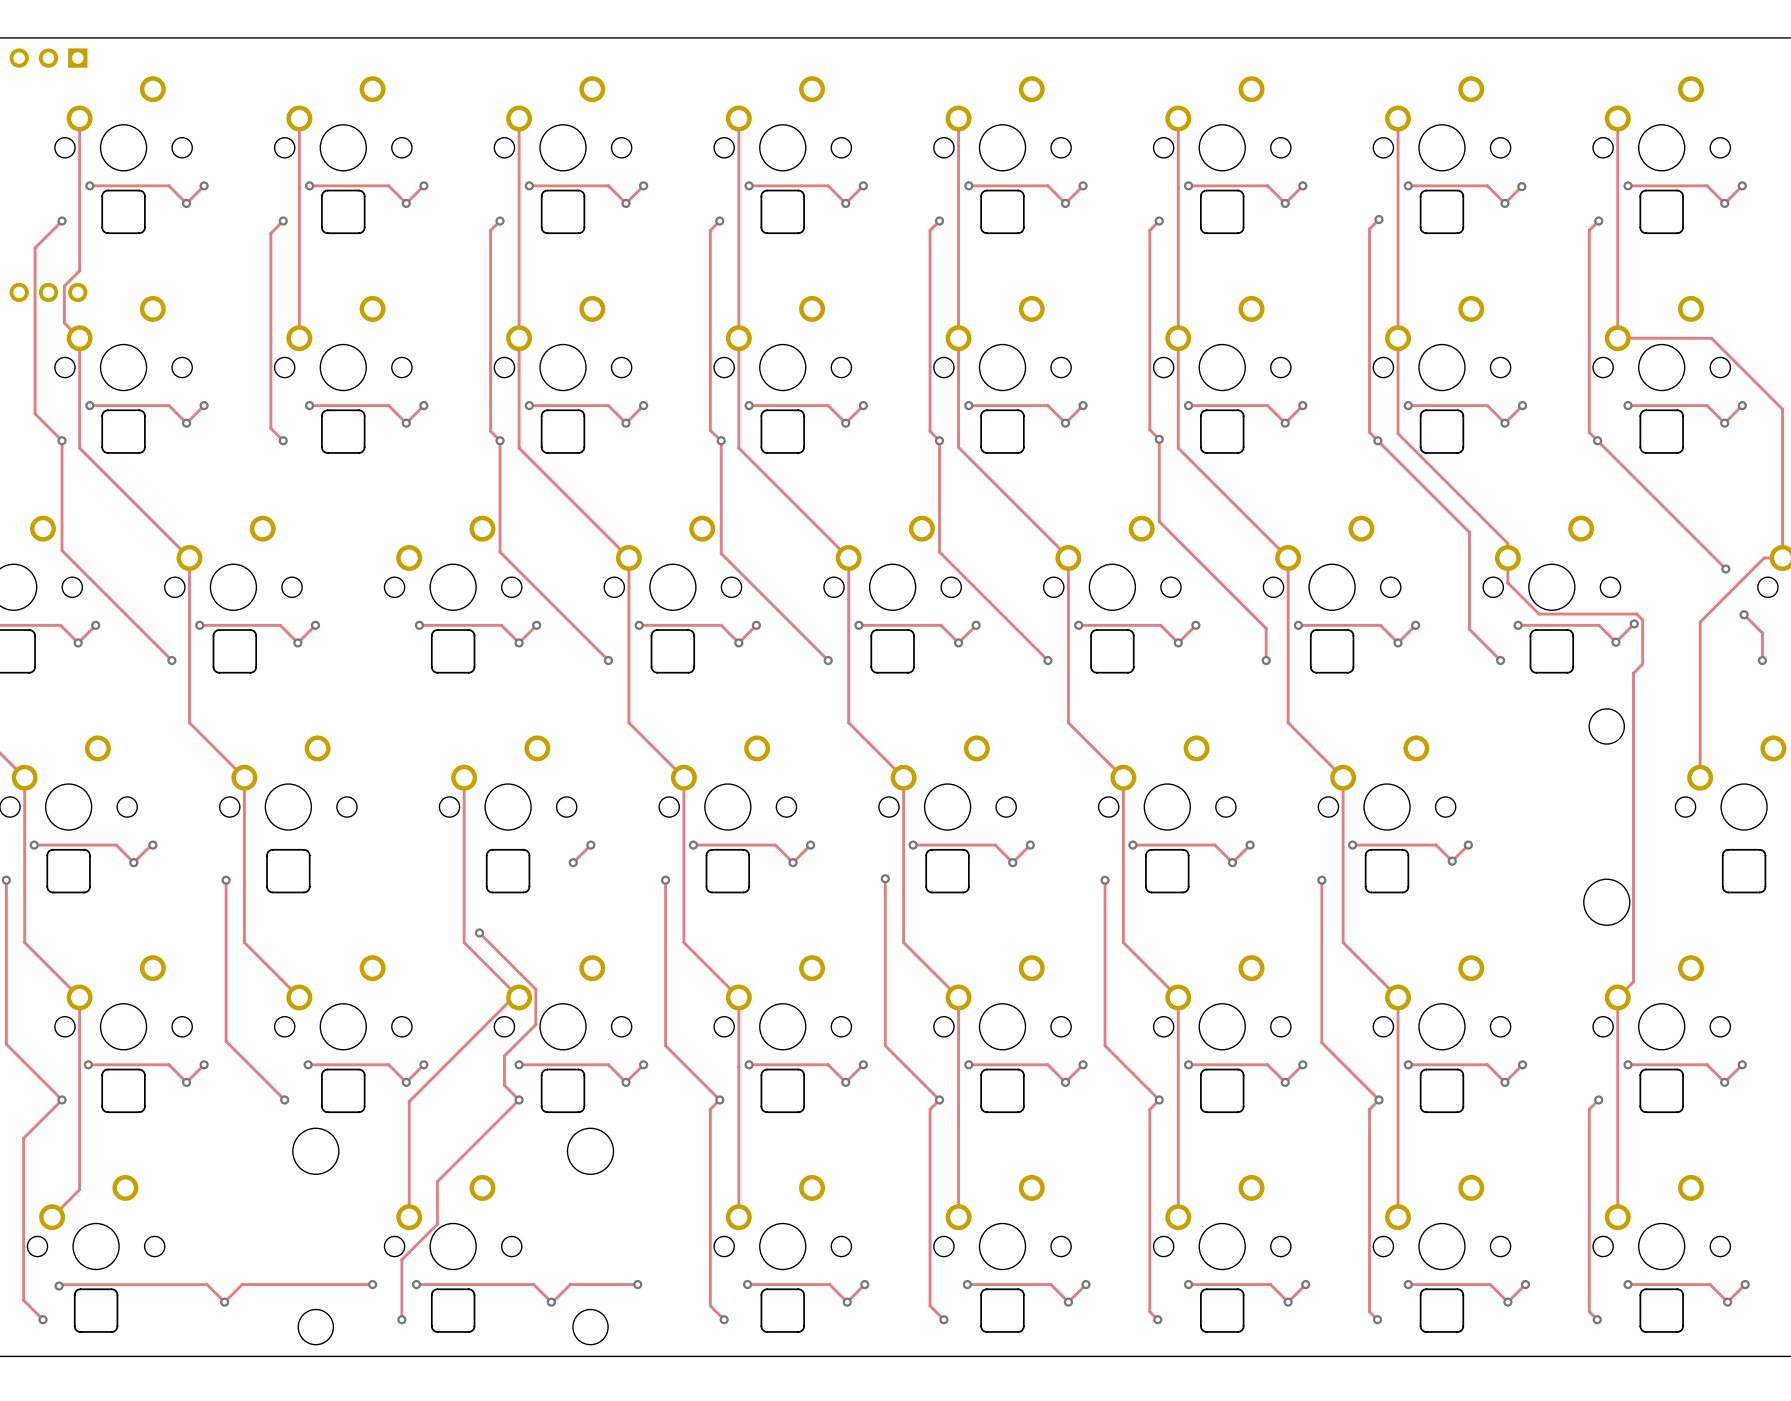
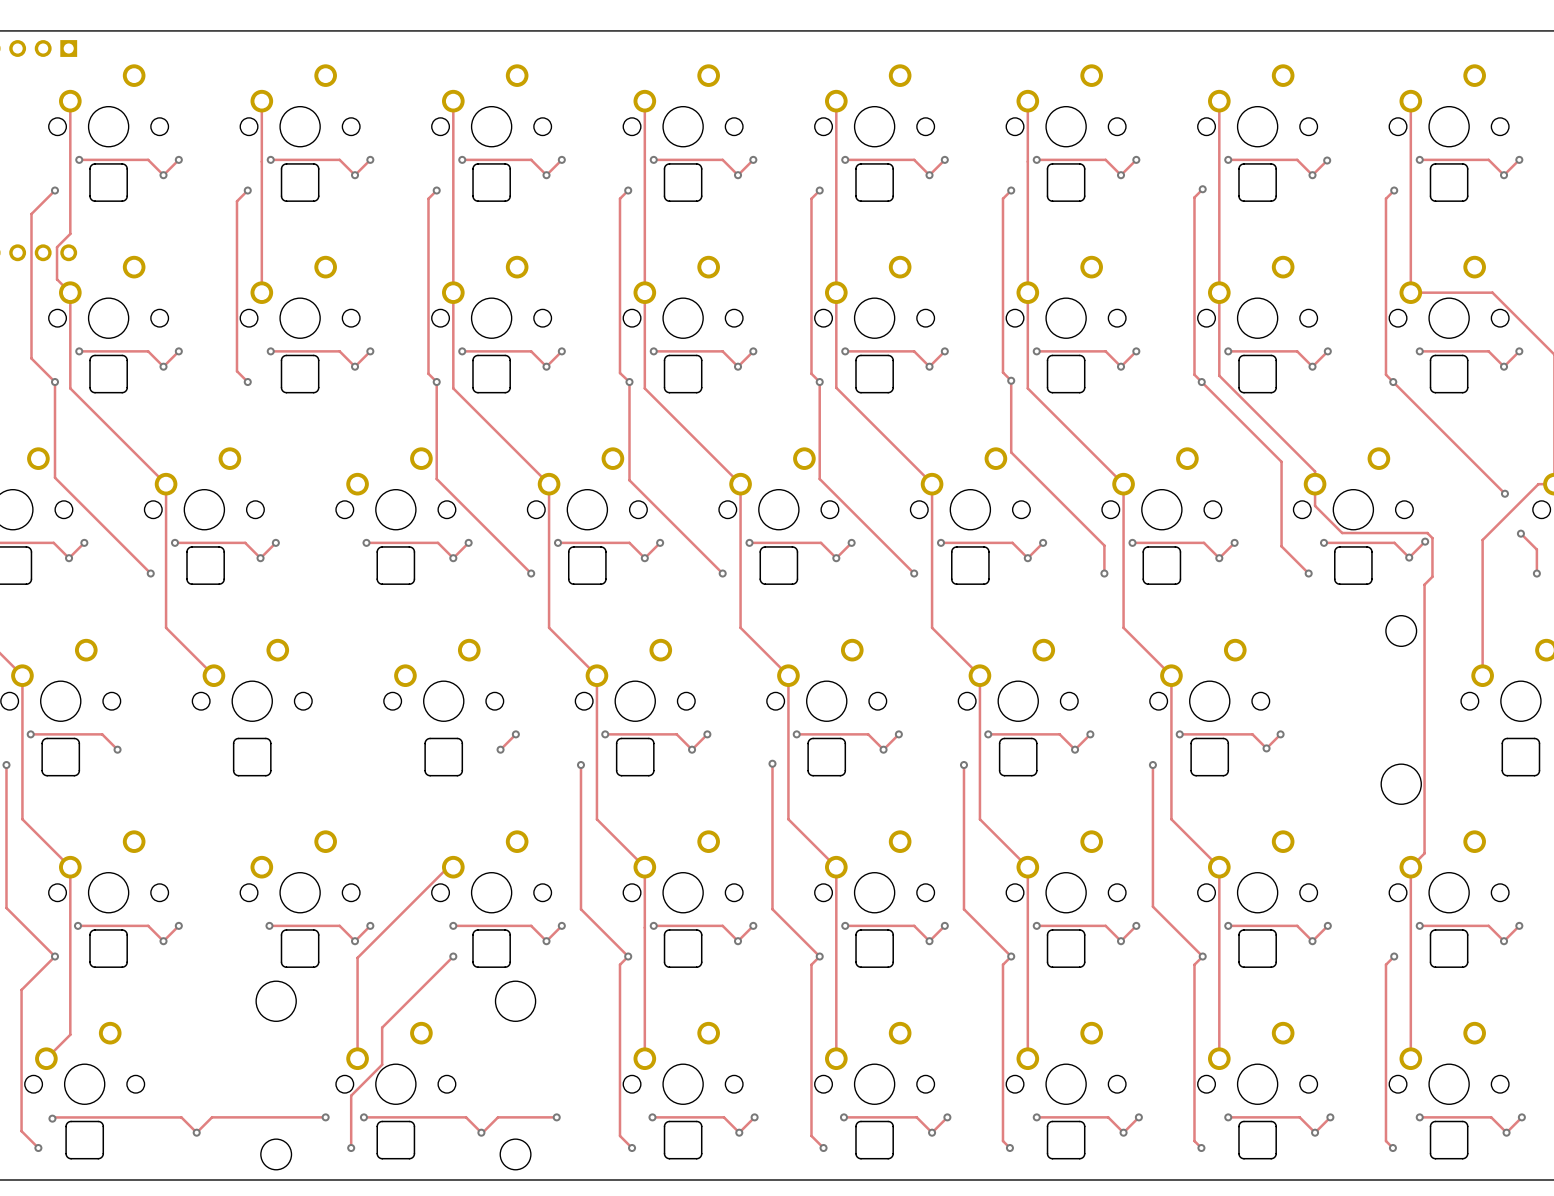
track: (244, 777) (244, 942) (299, 997) -> none
track: (464, 777) (464, 942) (519, 997) -> none
track: (152, 845) (133, 862) -> none
via: (152, 845) -> none
track: (226, 880) (226, 1041) (284, 1099) -> none
via: (226, 880) -> none
track: (479, 932) (535, 989) (535, 1024) (504, 1056) (504, 1085) (519, 1099) -> none
via: (479, 932) -> none
via: (284, 1099) -> none

